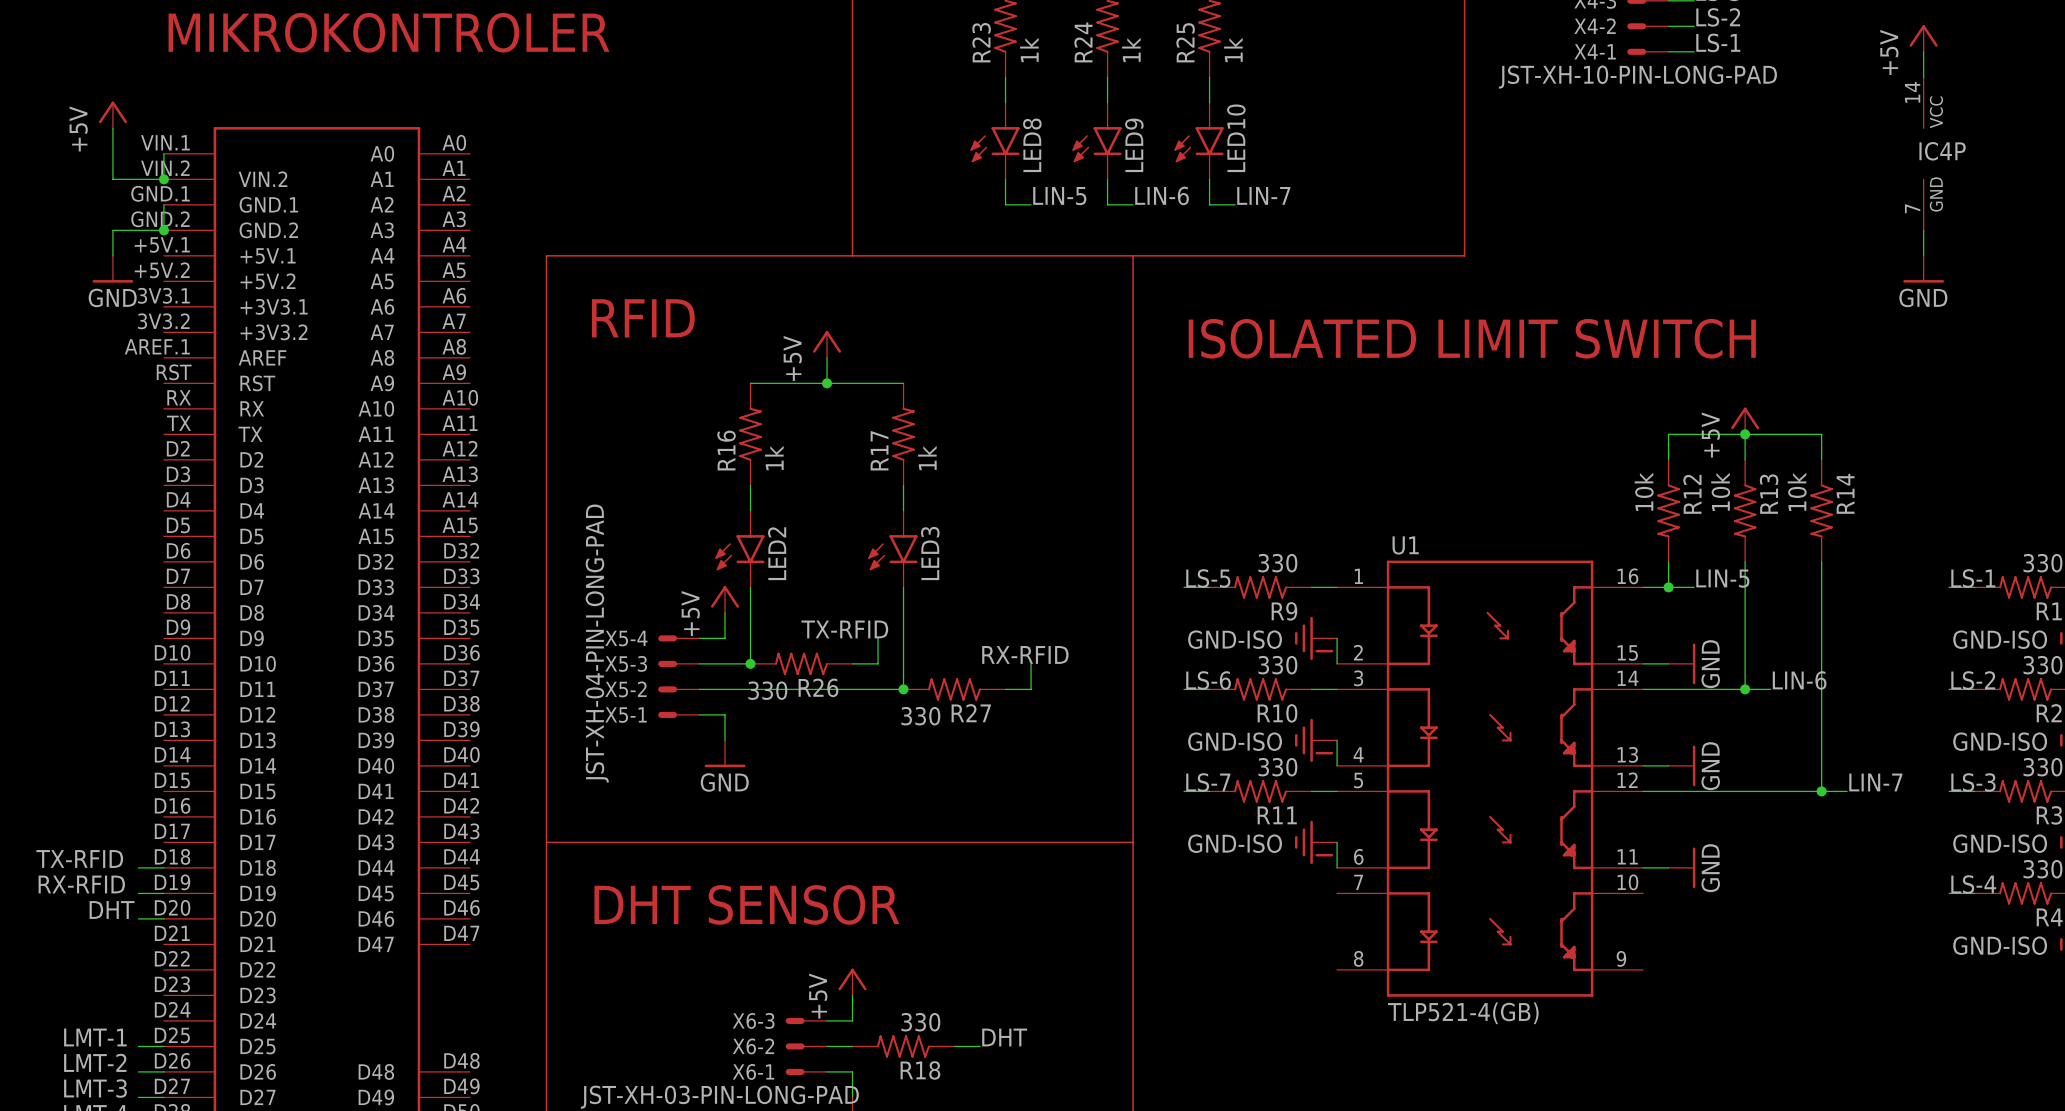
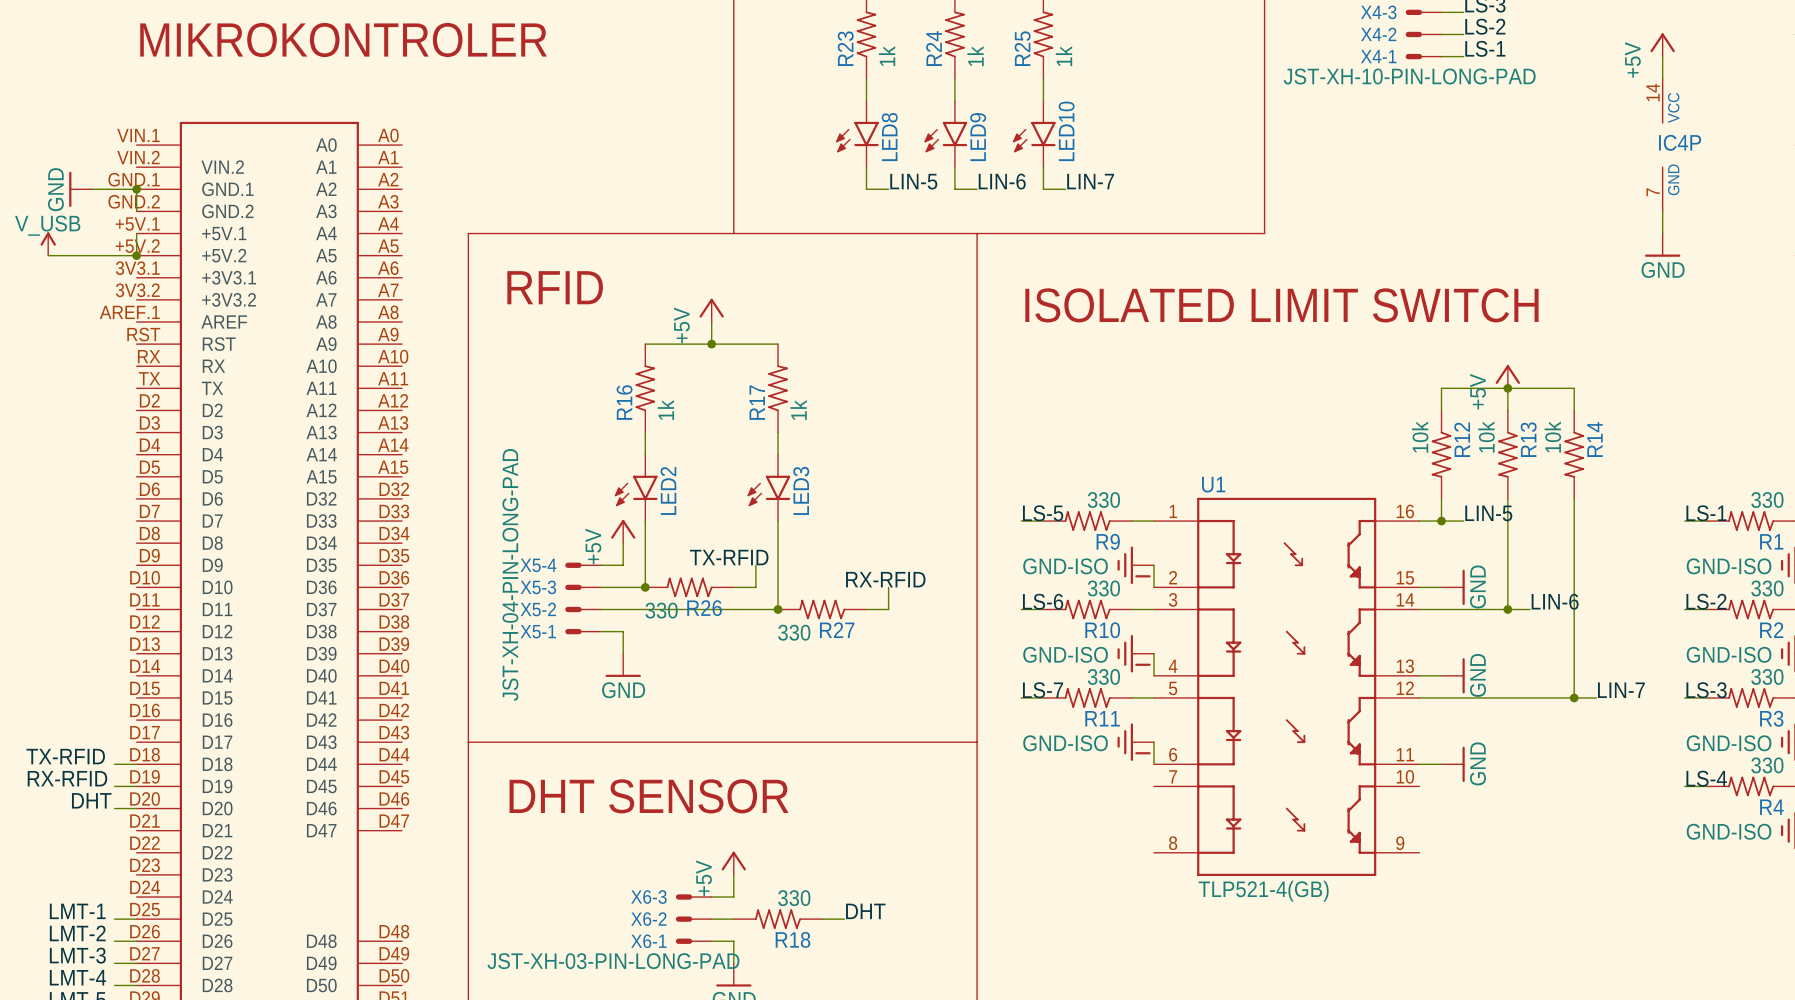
power symbol: +5V (112, 114) -> none
wire: (112, 128) (112, 179) (163, 179) (163, 153) -> none
junction: (163, 179) -> none
wire: none -> (92, 189) (136, 189)
junction: none -> (136, 189)
wire: (163, 230) (112, 230) (112, 255) -> none
junction: (163, 230) -> none
wire: none -> (136, 233) (136, 255) (48, 255)
power symbol: none -> V_USB (48, 244)
power symbol position: GND (112, 269) -> GND (80, 189)
power symbol rotation: 0° (112, 281) -> 90° clockwise (70, 189)
junction: none -> (136, 255)

